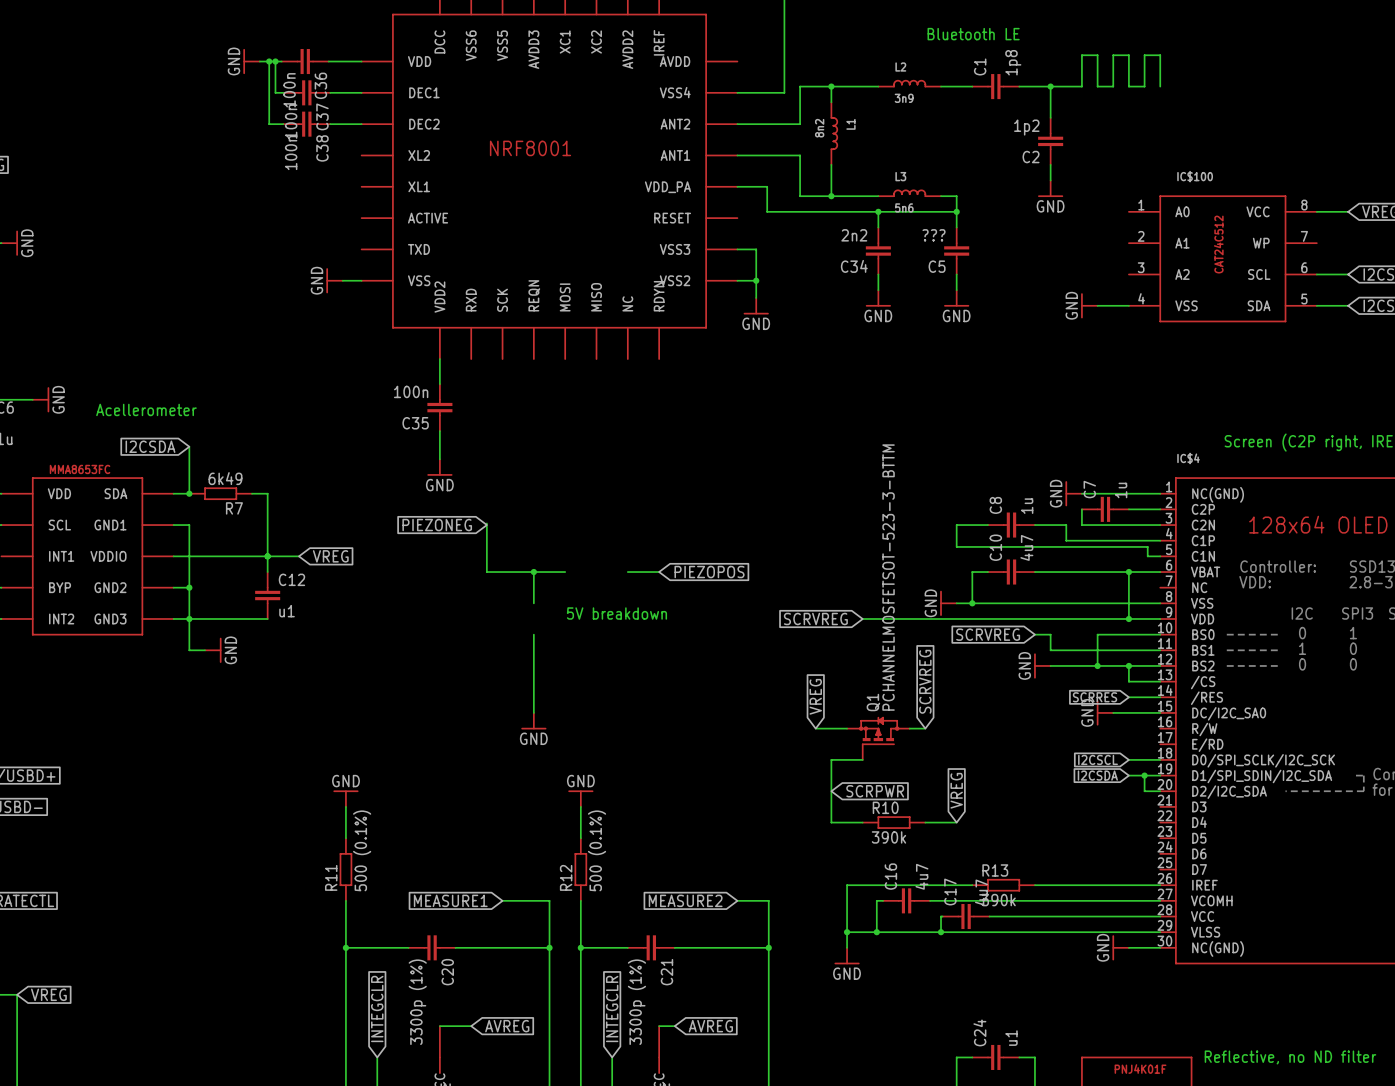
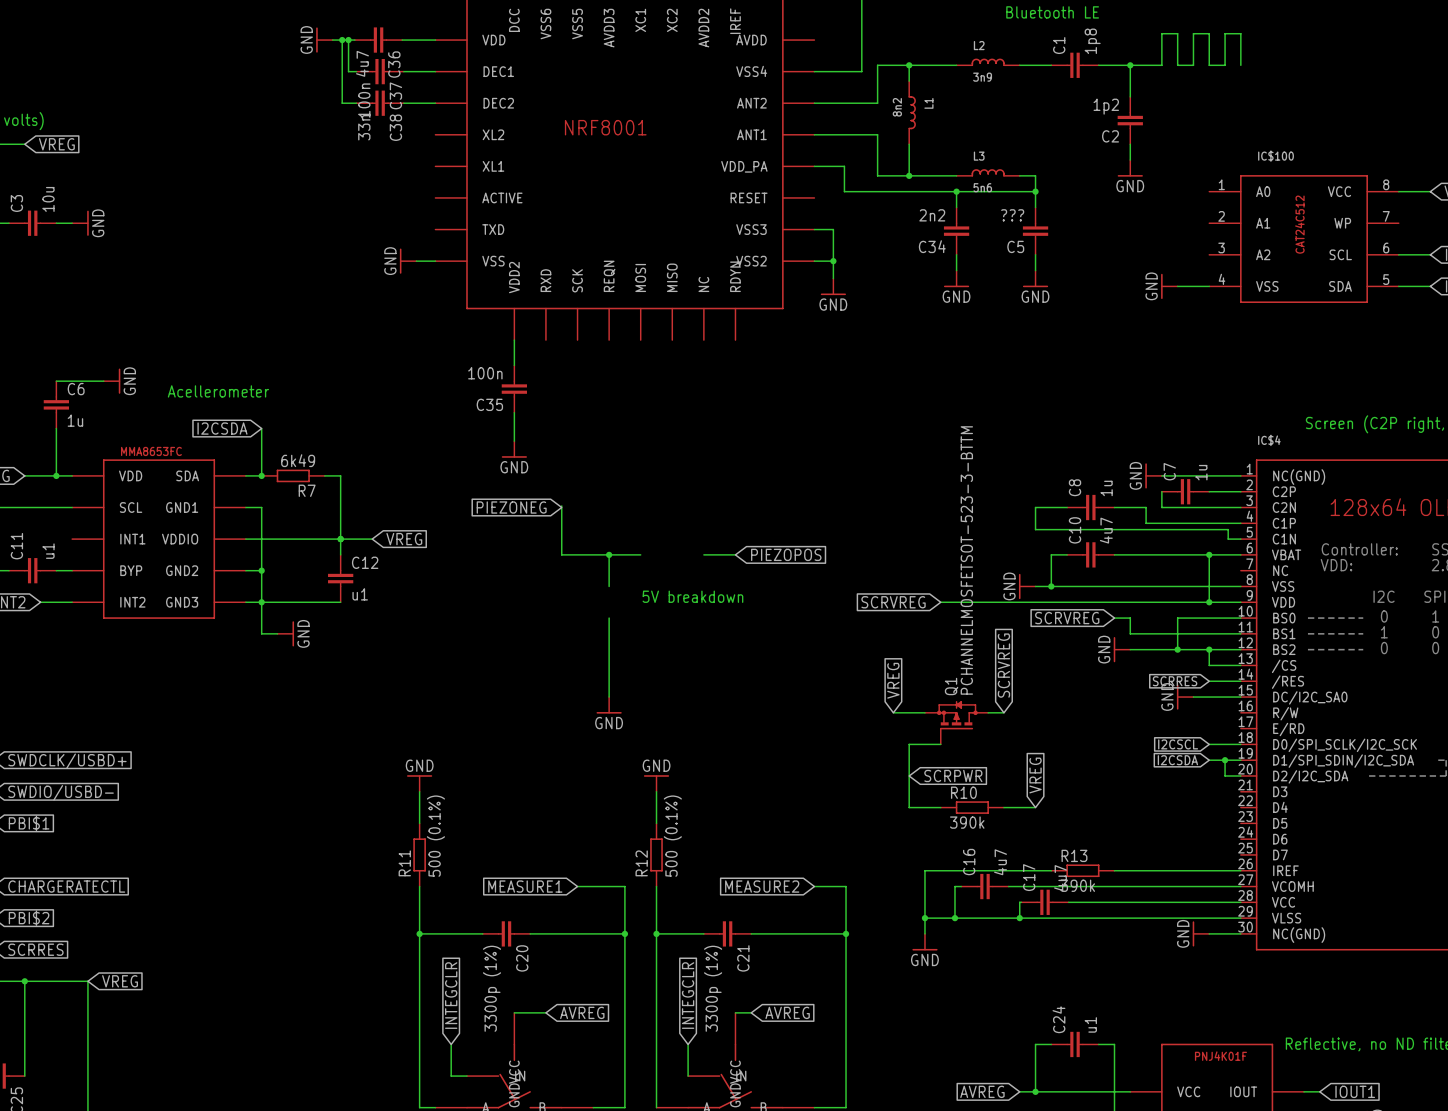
C36 value: 100n (289, 90) -> 4u7 (362, 63)
C38 value: 100n (291, 152) -> 33n (364, 127)

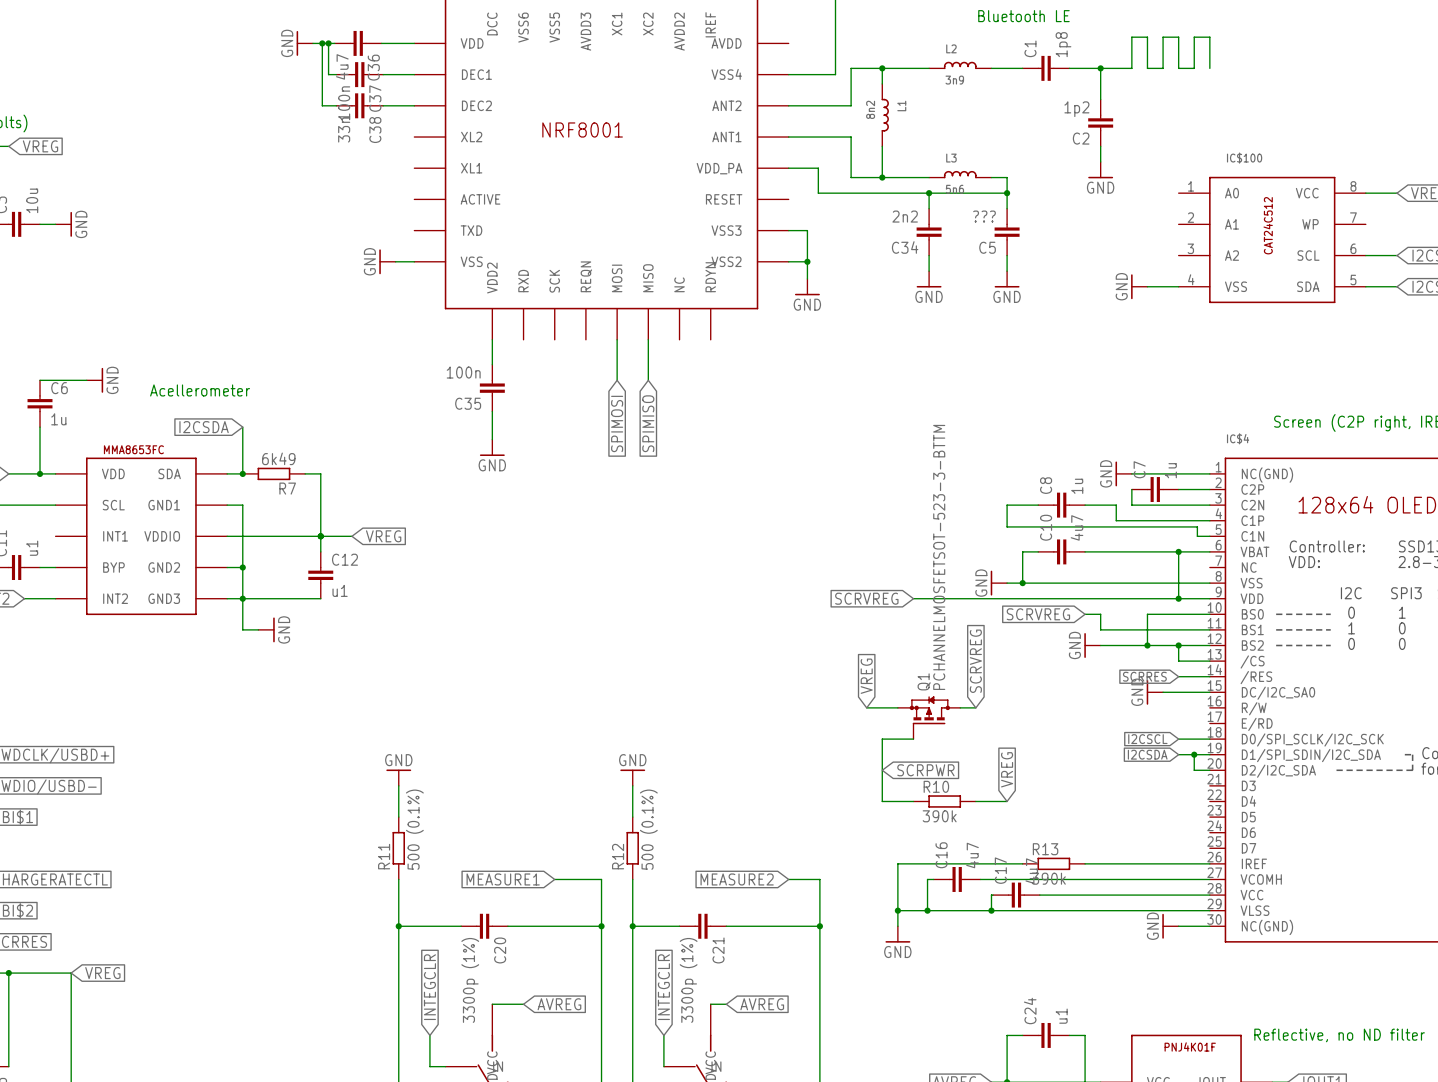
wire: none -> (617, 339) (617, 380)
wire: none -> (648, 339) (648, 380)
global label: none -> SPIMOSI (617, 423)
global label: none -> SPIMISO (648, 423)
wire: (561, 505) (561, 554) (640, 554) -> none
global label: PIEZONEG (511, 507) -> none
wire: (609, 554) (609, 586) -> none
junction: (609, 554) -> none
wire: (703, 554) (735, 554) -> none
global label: PIEZOPOS (786, 554) -> none
text: 5V breakdown (692, 596) -> none
wire: (609, 618) (609, 697) -> none
power symbol: GND (609, 705) -> none

